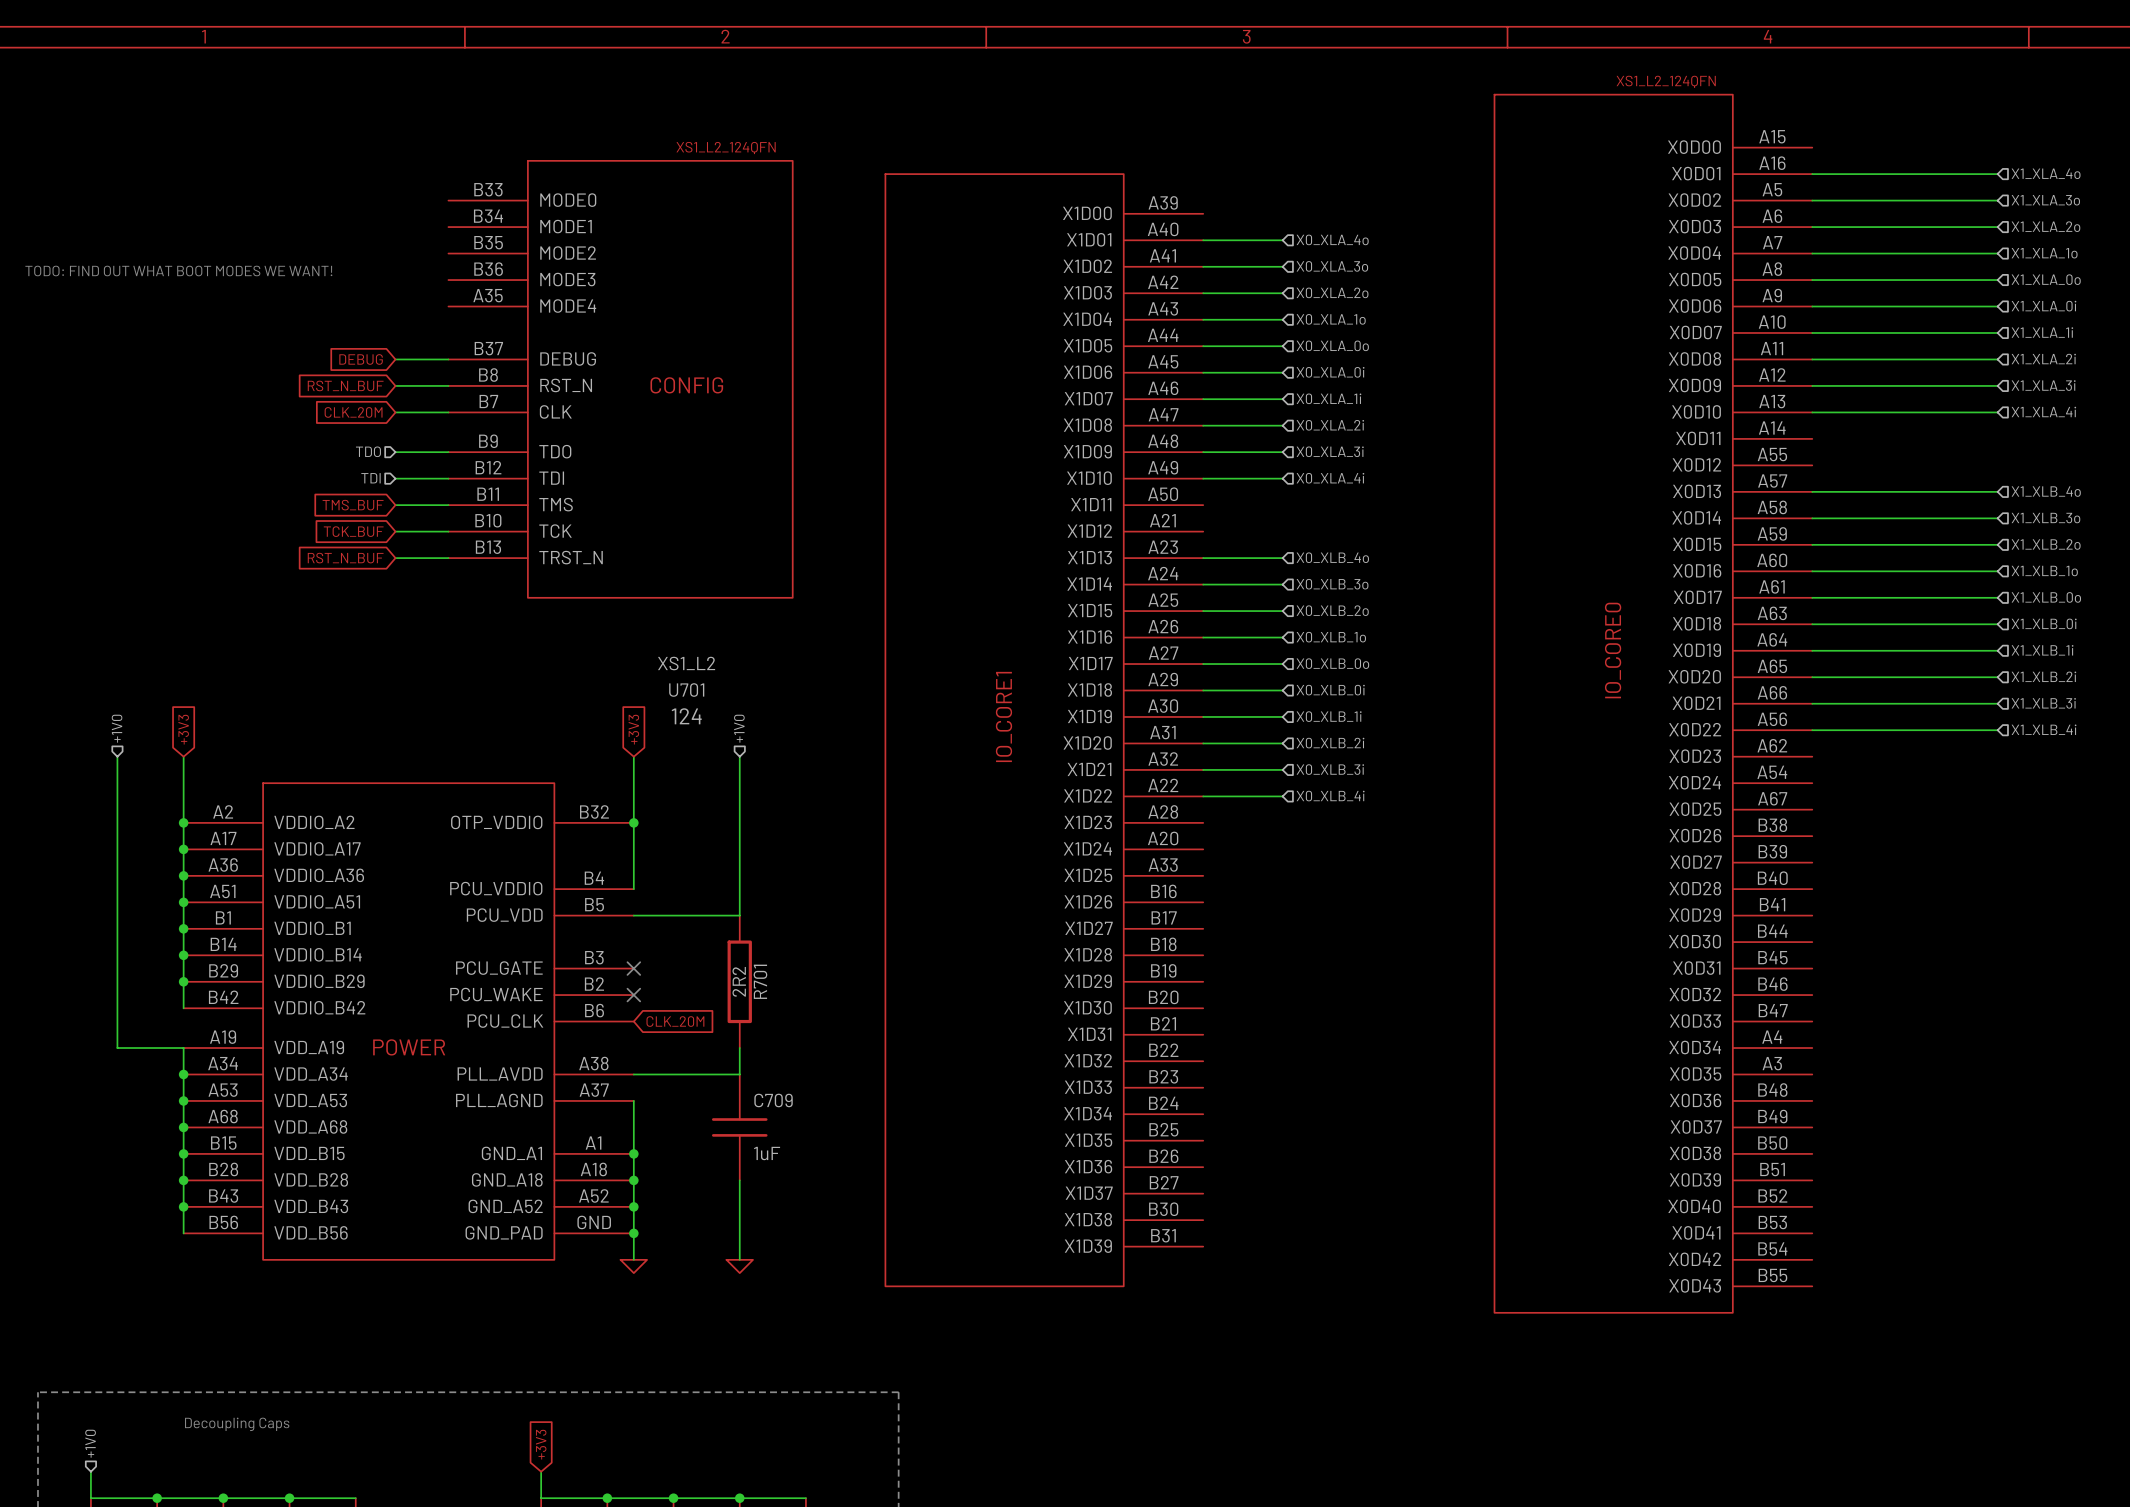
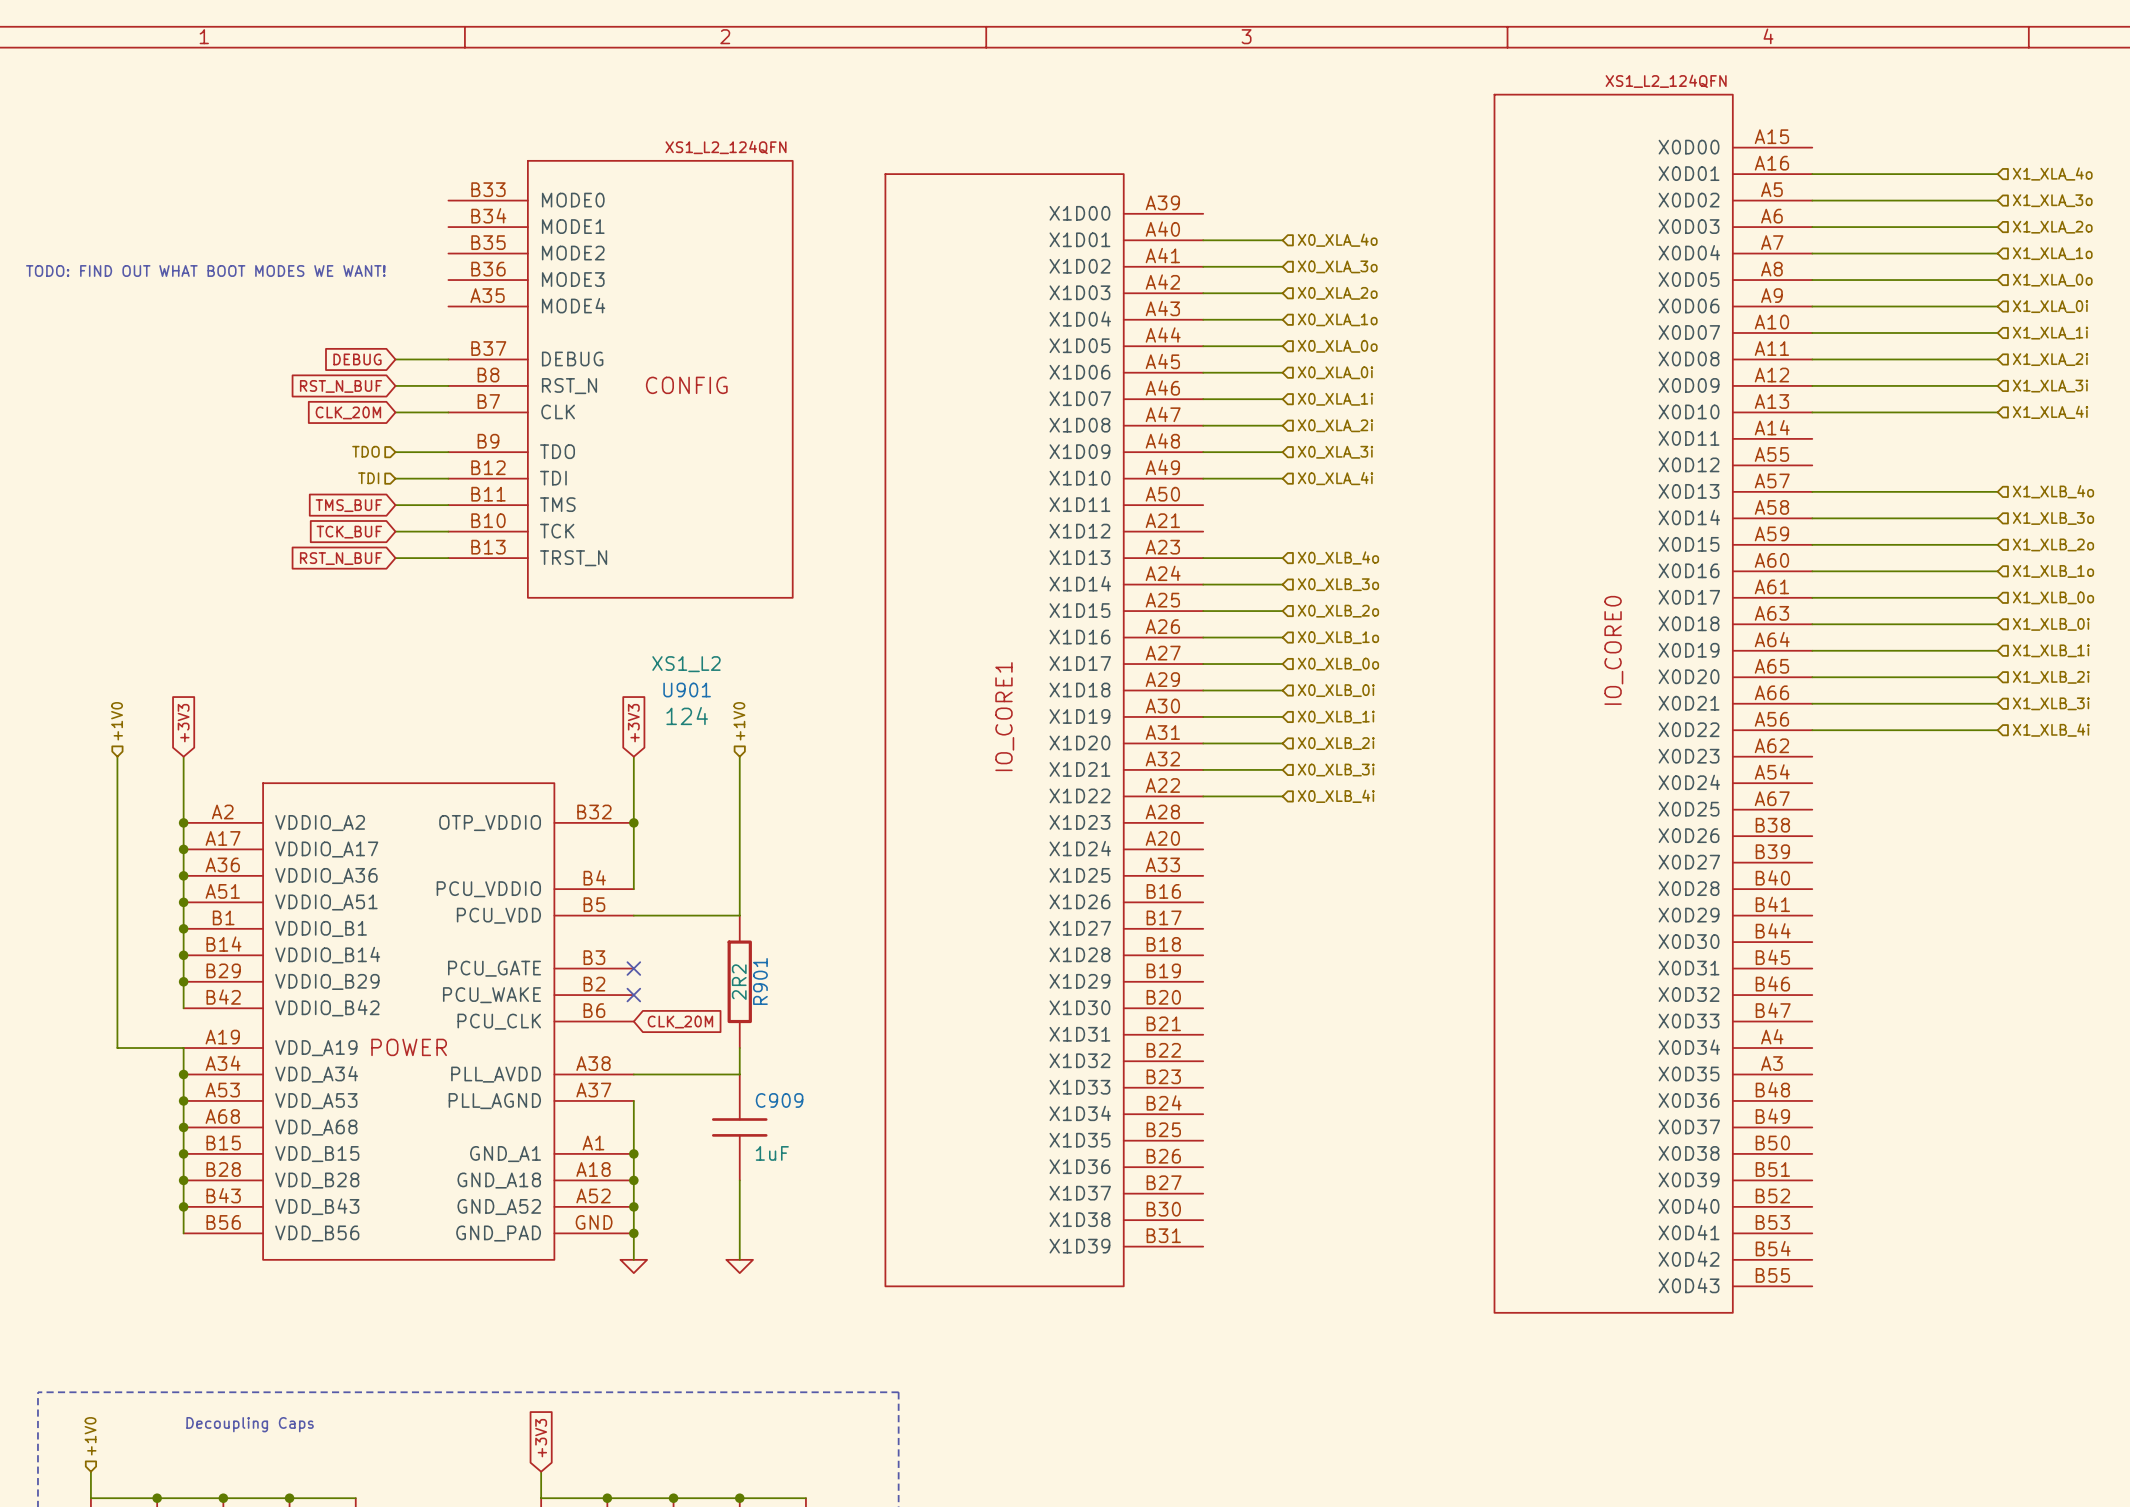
U701 name: U701 (686, 690) -> U901 (687, 690)
R701 name: R701 (760, 981) -> R901 (760, 981)
C709 name: C709 (773, 1100) -> C909 (779, 1100)

